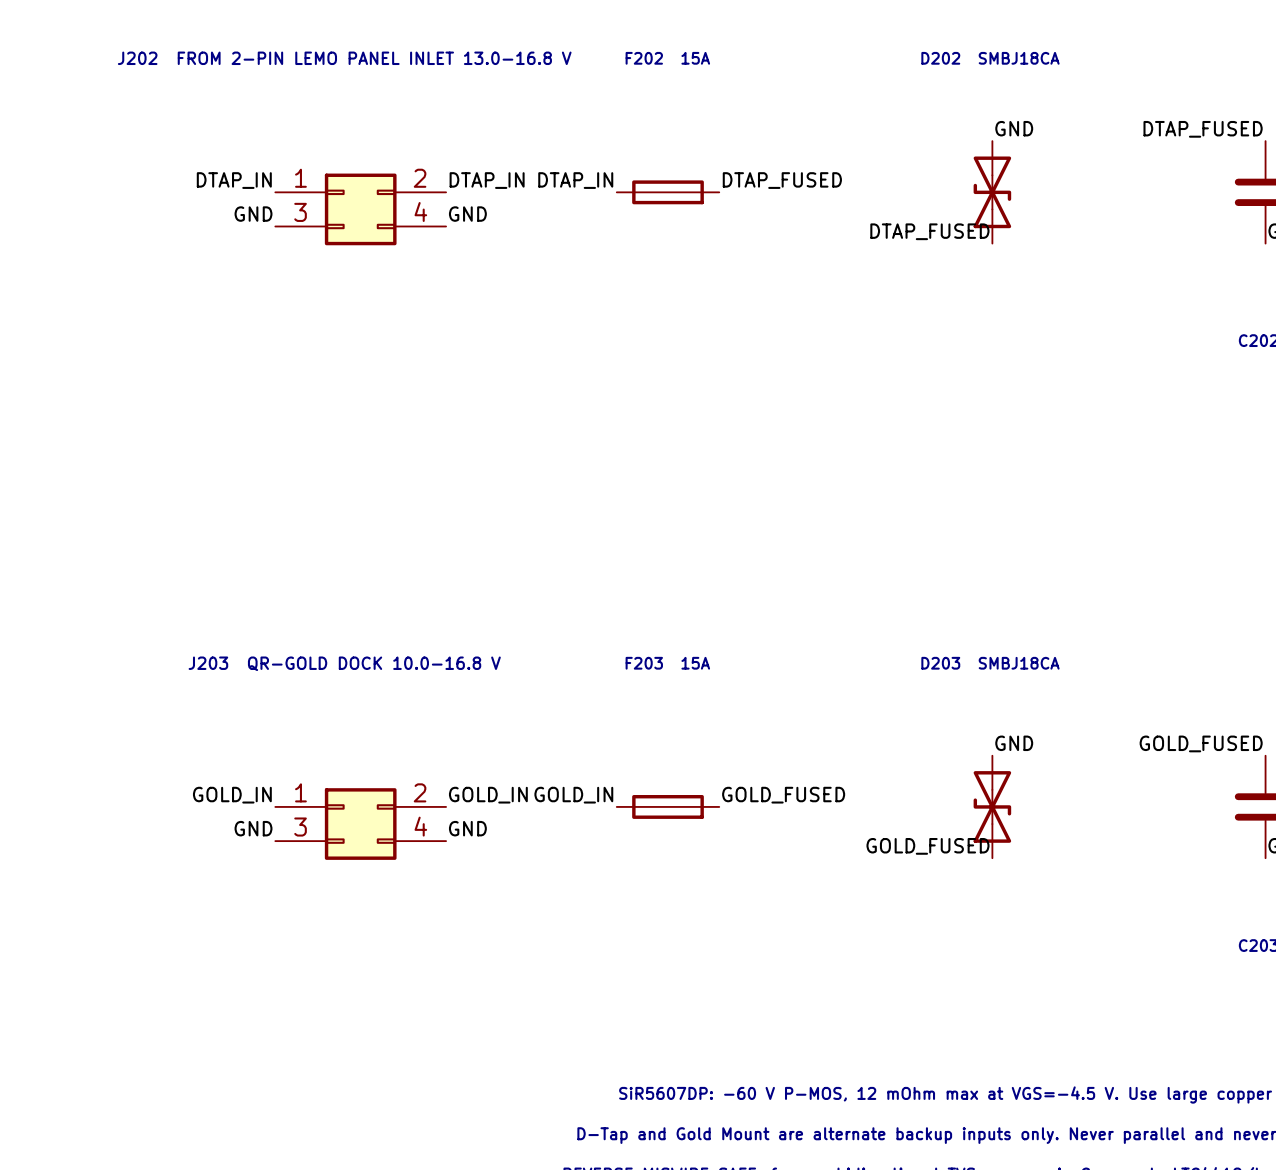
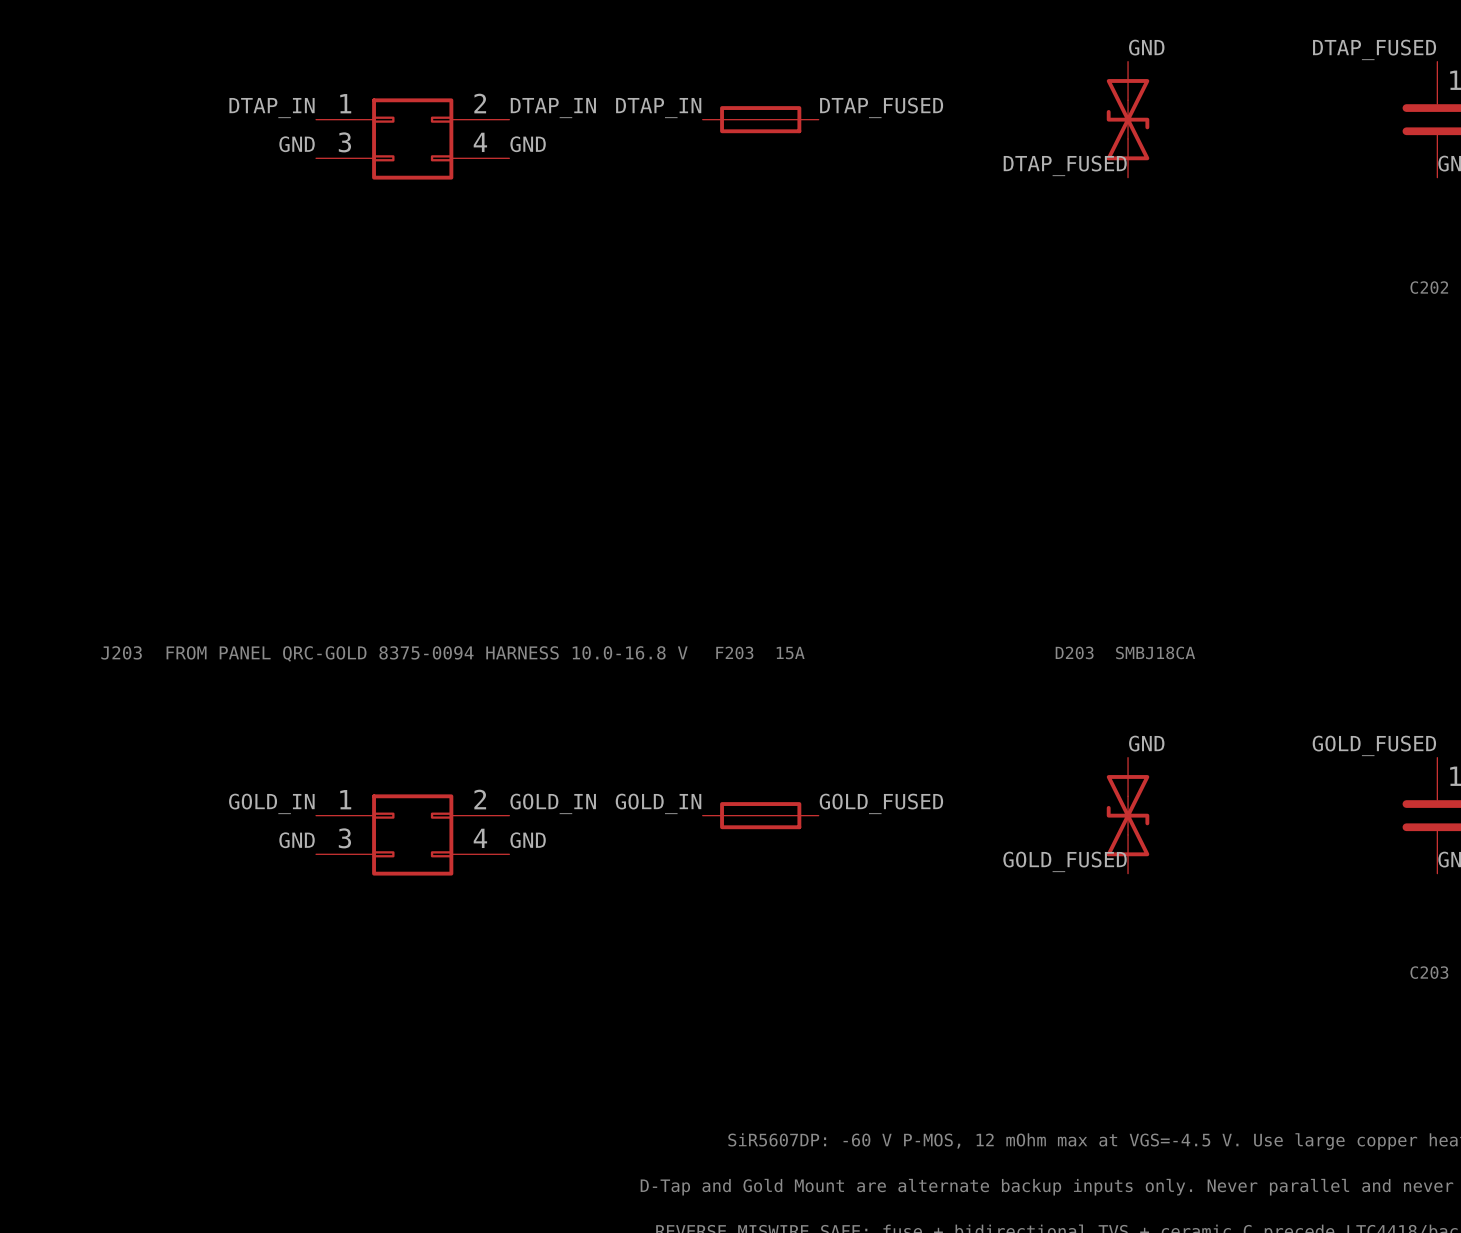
text: J203 QR-GOLD DOCK 10.0-16.8 V (344, 663) -> J203 FROM PANEL QRC-GOLD 8375-0094 HARNESS 10.0-16.8 V (394, 653)

